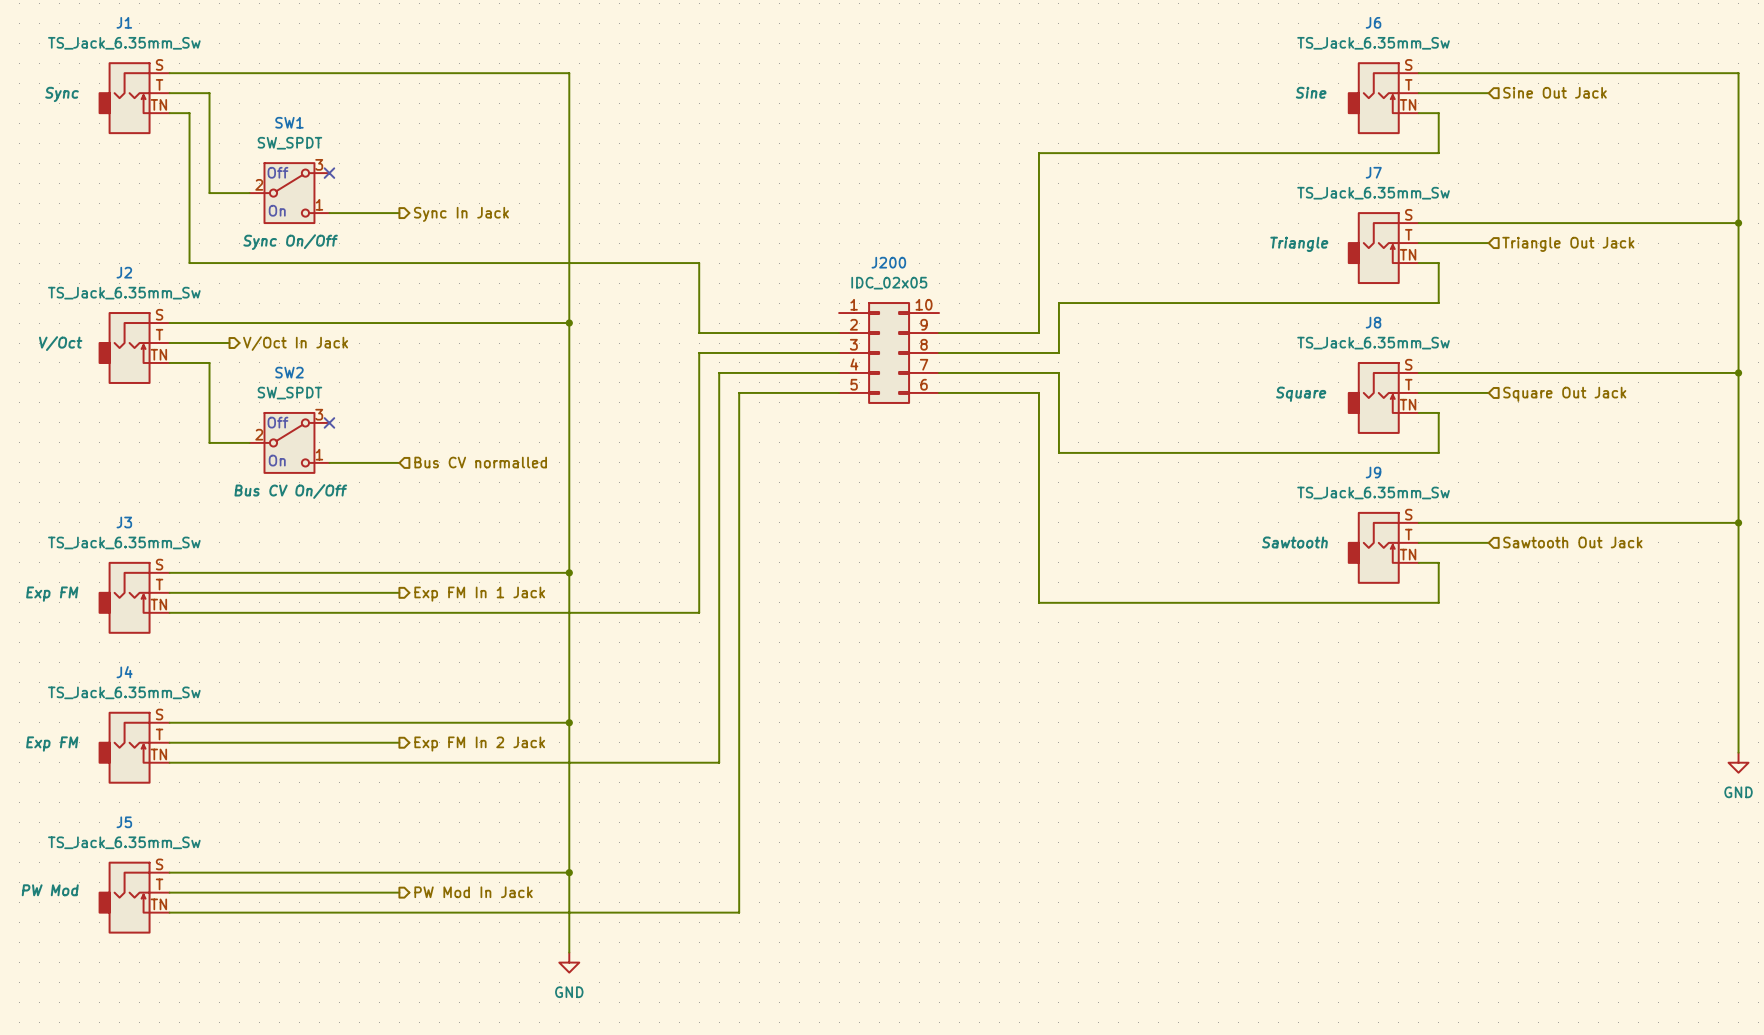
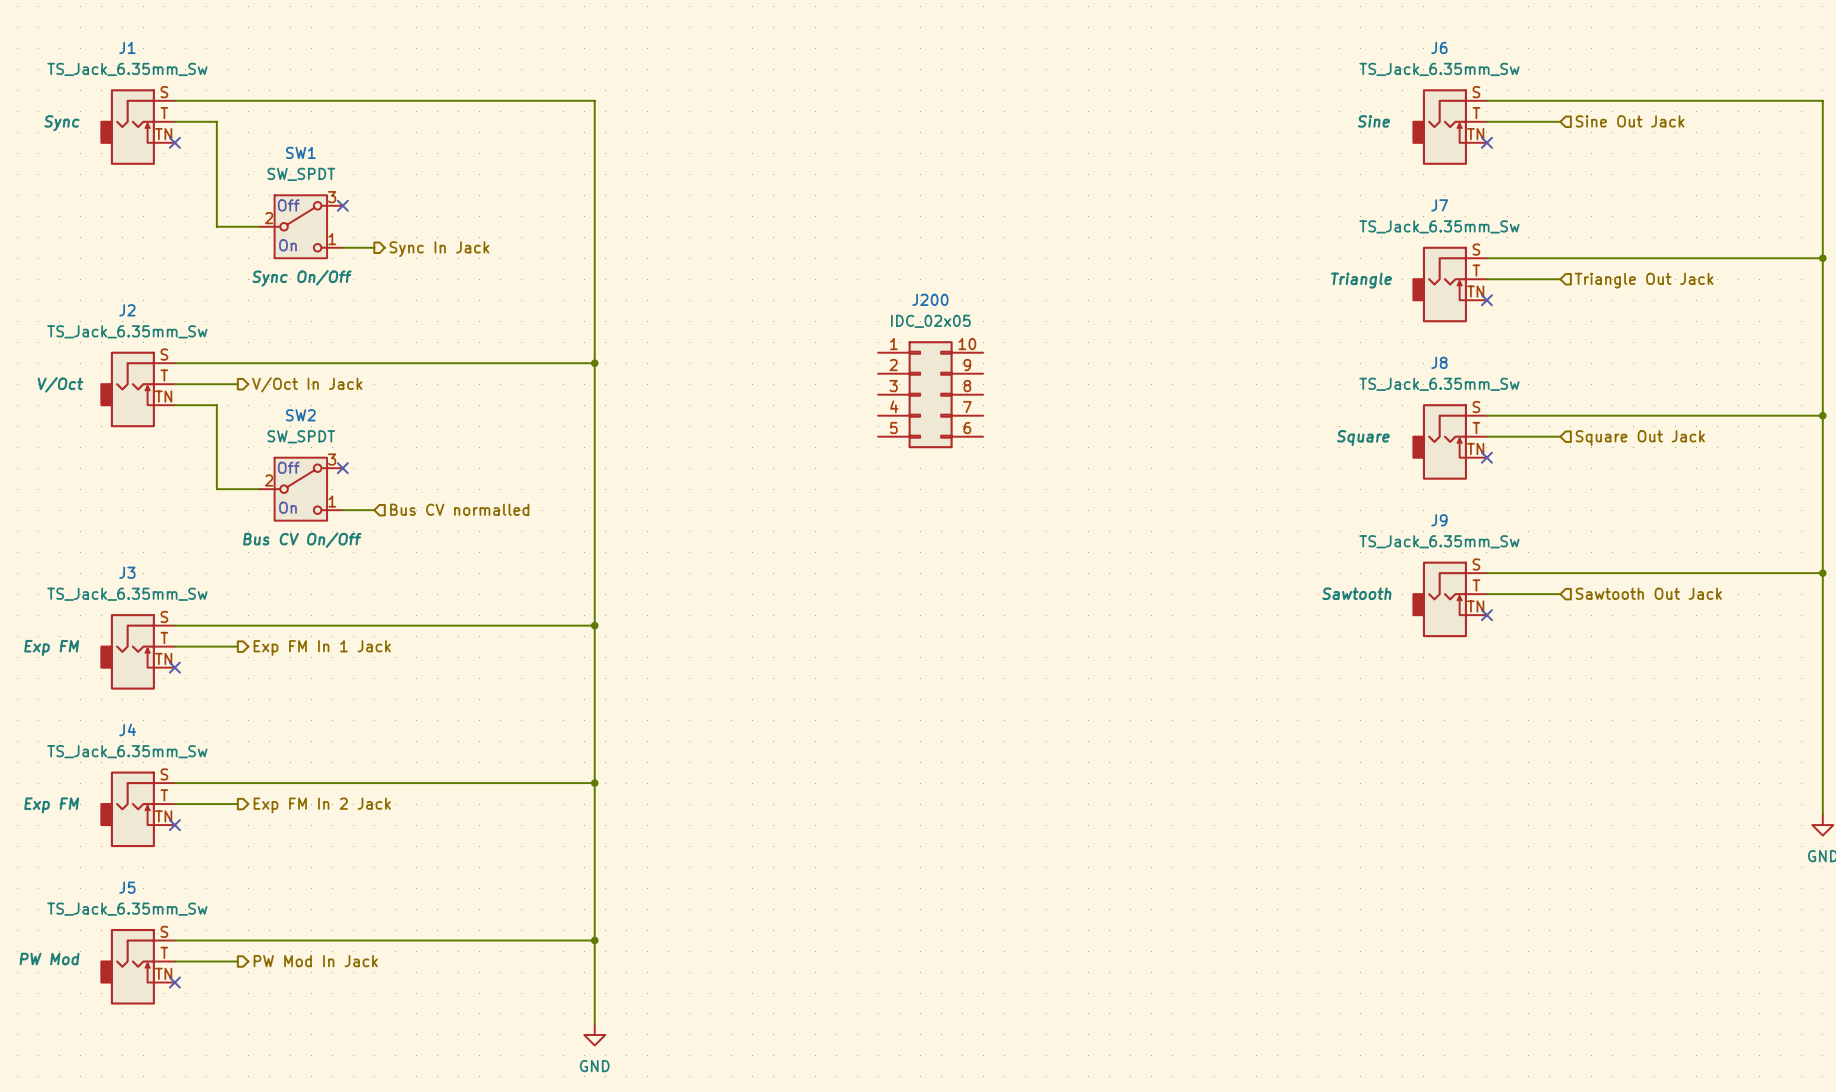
wire: (169, 113) (189, 113) (189, 263) (699, 263) (699, 333) (839, 333) -> none
no-connect mark: none -> (174, 142)
wire: (1418, 113) (1438, 113) (1438, 153) (1038, 153) (1038, 333) (939, 333) -> none
no-connect mark: none -> (1486, 142)
wire: (359, 213) (399, 213) -> none
hierarchical label position: Sync In Jack (461, 214) -> Sync In Jack (439, 249)
wire: (1418, 263) (1438, 263) (1438, 303) (1058, 303) (1058, 352) (939, 352) -> none
no-connect mark: none -> (1486, 300)
wire: (839, 352) (699, 352) (699, 612) (169, 612) -> none
wire: (839, 372) (719, 372) (719, 762) (169, 762) -> none
wire: (939, 372) (1058, 372) (1058, 452) (1438, 452) (1438, 412) (1418, 412) -> none
wire: (839, 392) (739, 392) (739, 912) (169, 912) -> none
wire: (939, 392) (1038, 392) (1038, 602) (1438, 602) (1438, 562) (1418, 562) -> none
no-connect mark: none -> (1486, 457)
wire: (359, 462) (399, 462) -> none
hierarchical label position: Bus CV normalled (480, 462) -> Bus CV normalled (459, 509)
no-connect mark: none -> (1486, 615)
wire: (229, 592) (399, 592) -> none
hierarchical label position: Exp FM In 1 Jack (479, 594) -> Exp FM In 1 Jack (322, 647)
no-connect mark: none -> (174, 667)
wire: (229, 742) (399, 742) -> none
hierarchical label position: Exp FM In 2 Jack (479, 744) -> Exp FM In 2 Jack (322, 805)
no-connect mark: none -> (174, 825)
wire: (229, 892) (399, 892) -> none
hierarchical label position: PW Mod In Jack (473, 892) -> PW Mod In Jack (315, 961)
no-connect mark: none -> (174, 982)

